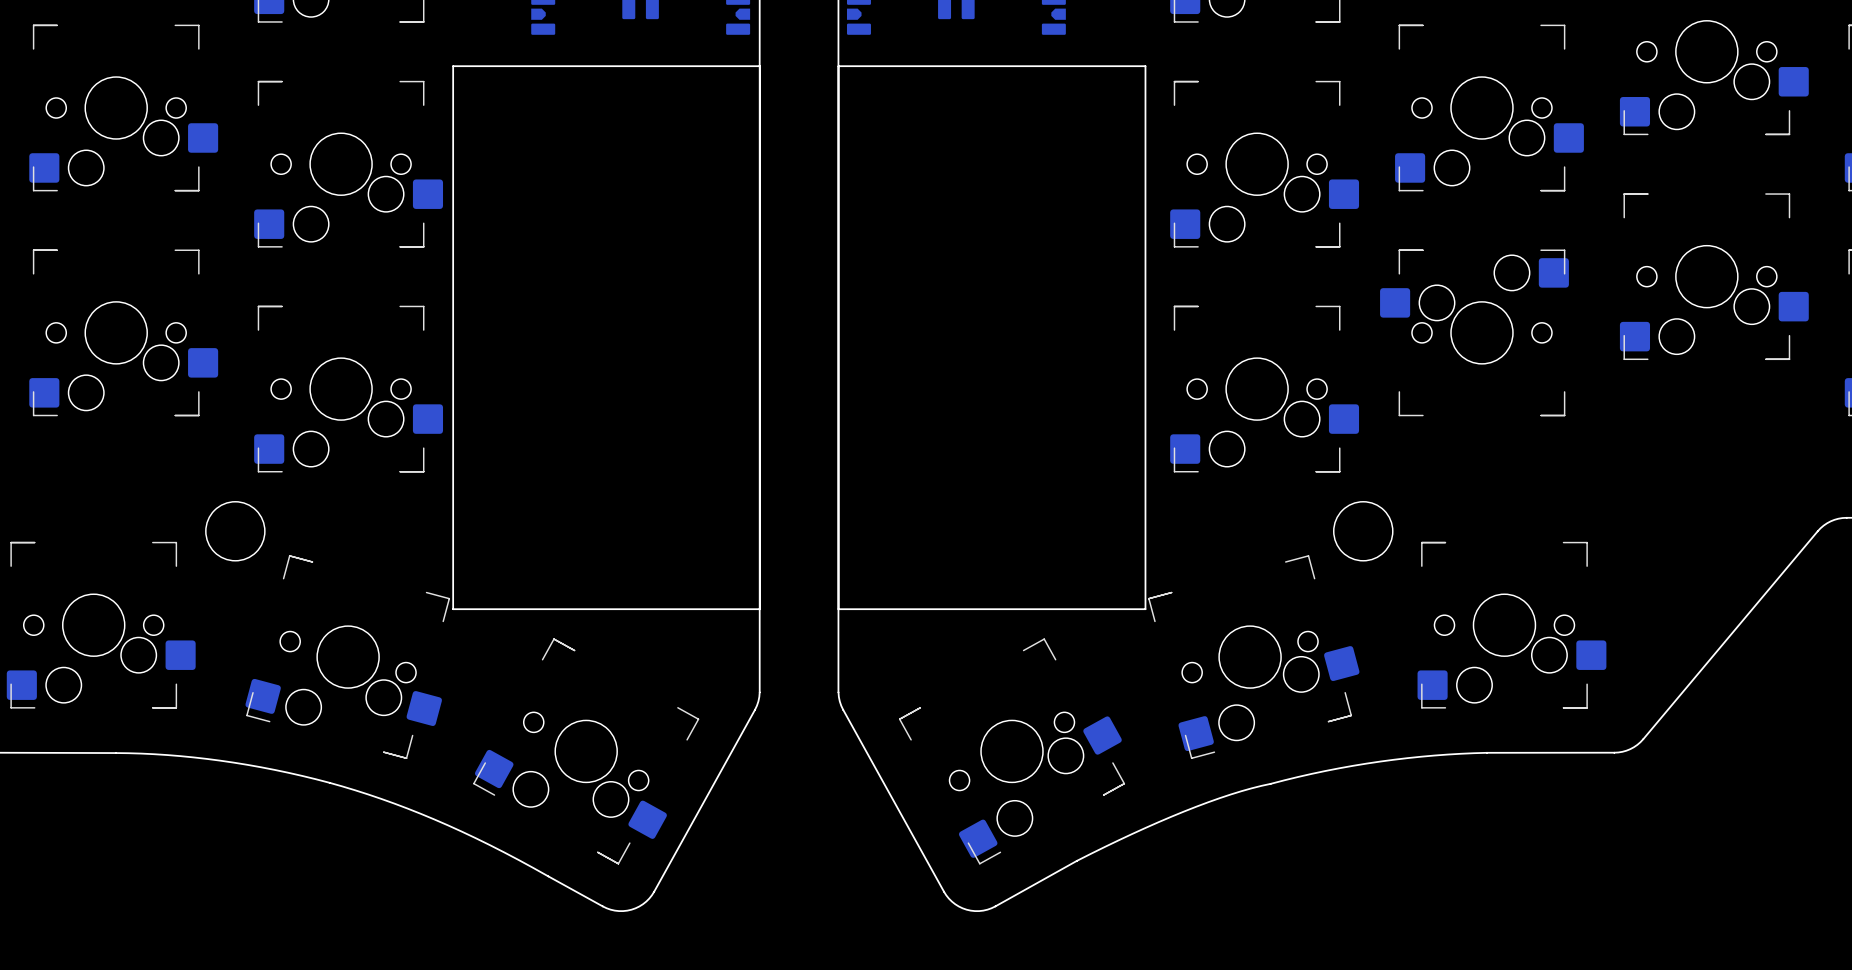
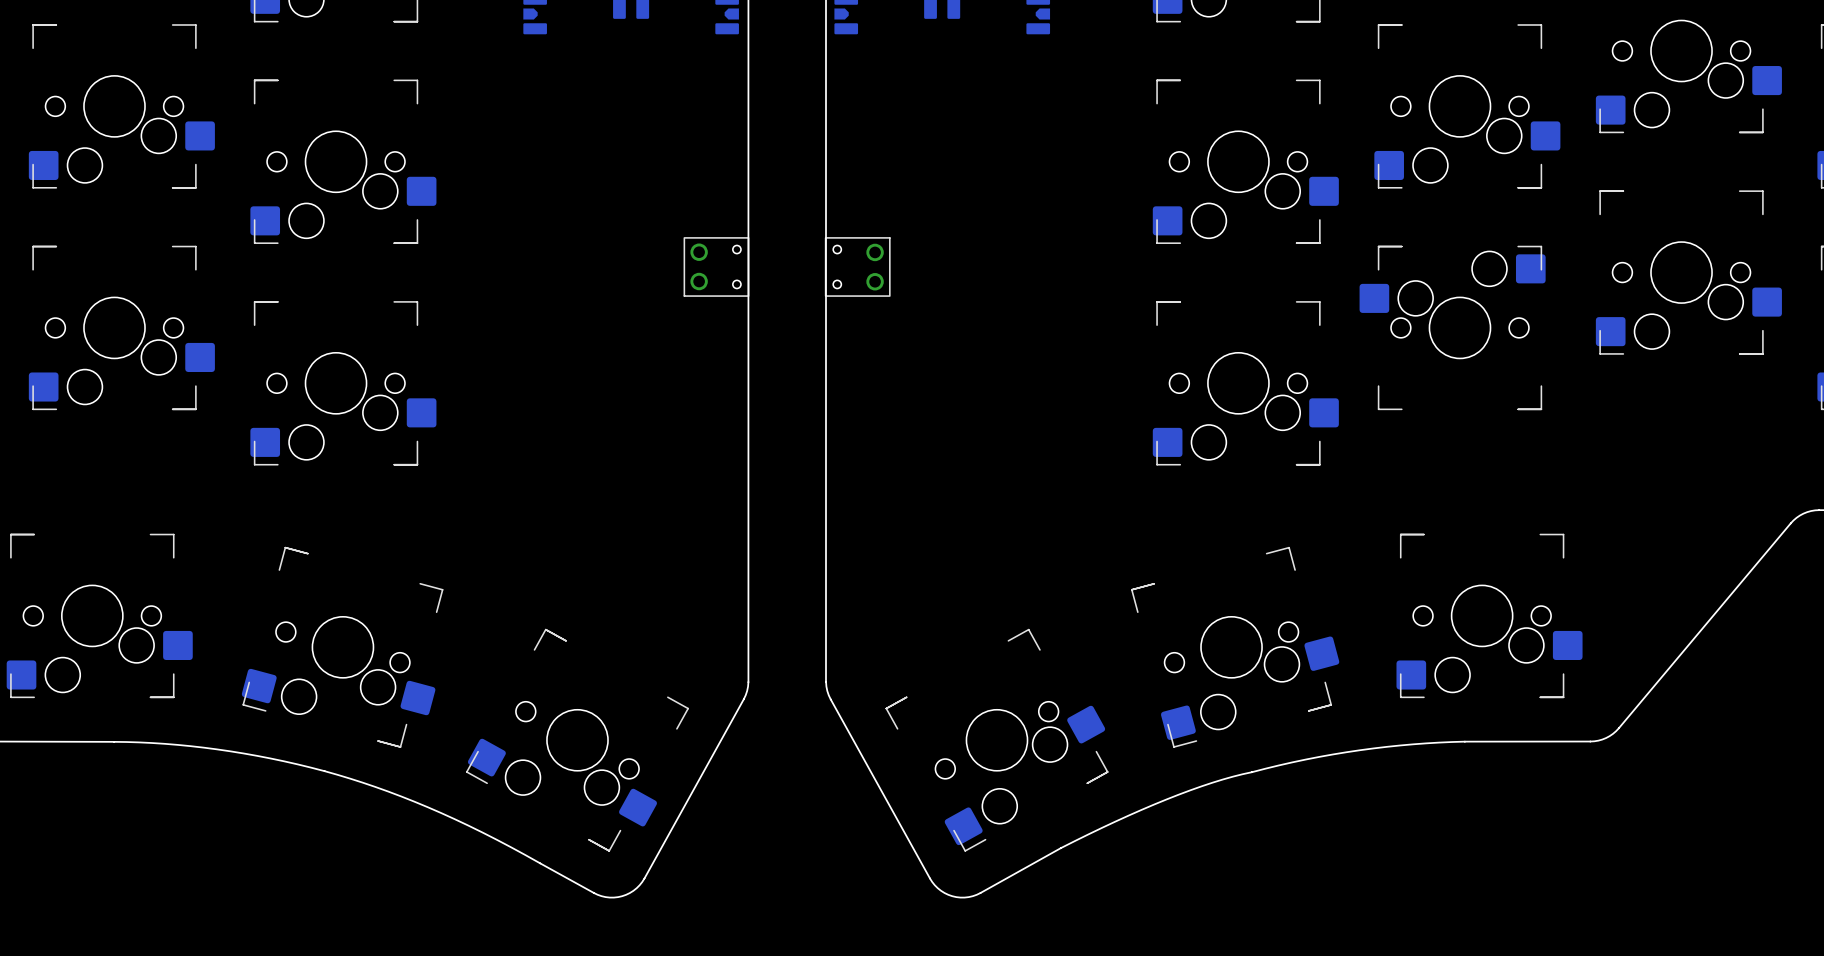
board edge: (453, 66) (760, 66) (760, 609) (453, 609) (453, 66) -> none
board edge: (838, 66) (1145, 66) (1145, 609) (838, 609) (838, 66) -> none
part: none -> (716, 266)
part: none -> (857, 266)
round board edge: [205, 501, 266, 562] -> none
round board edge: [1333, 501, 1394, 562] -> none

